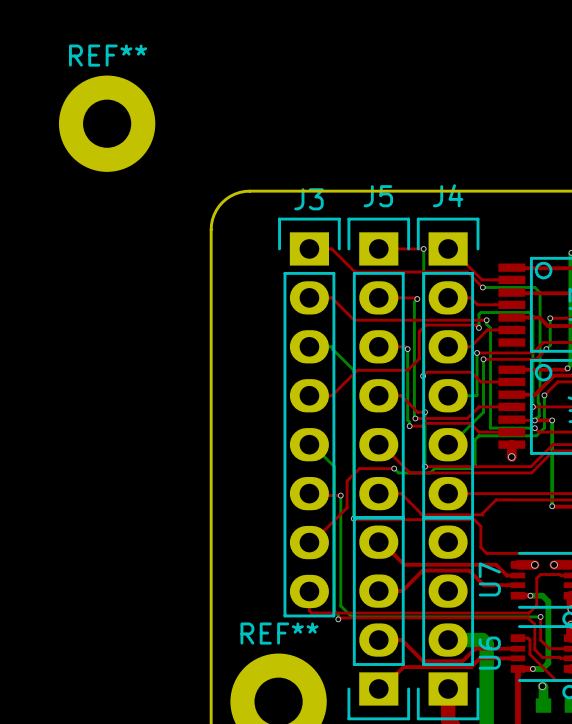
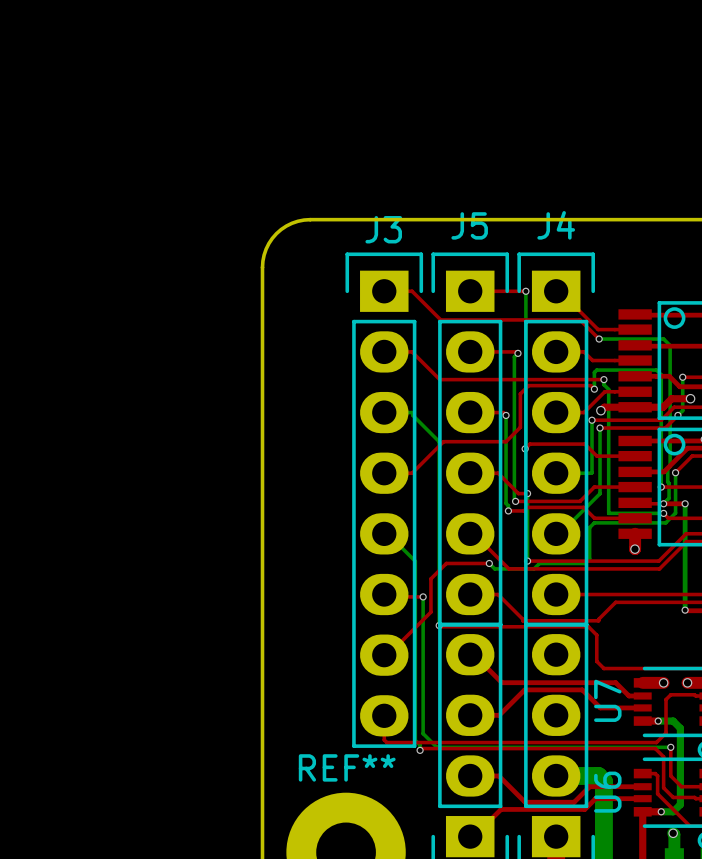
REF**: (107, 123) -> none
top track: none -> (690, 398) (671, 398) (663, 407) (604, 407) (600, 410)
via: none -> (690, 398)
via: none -> (600, 410)

